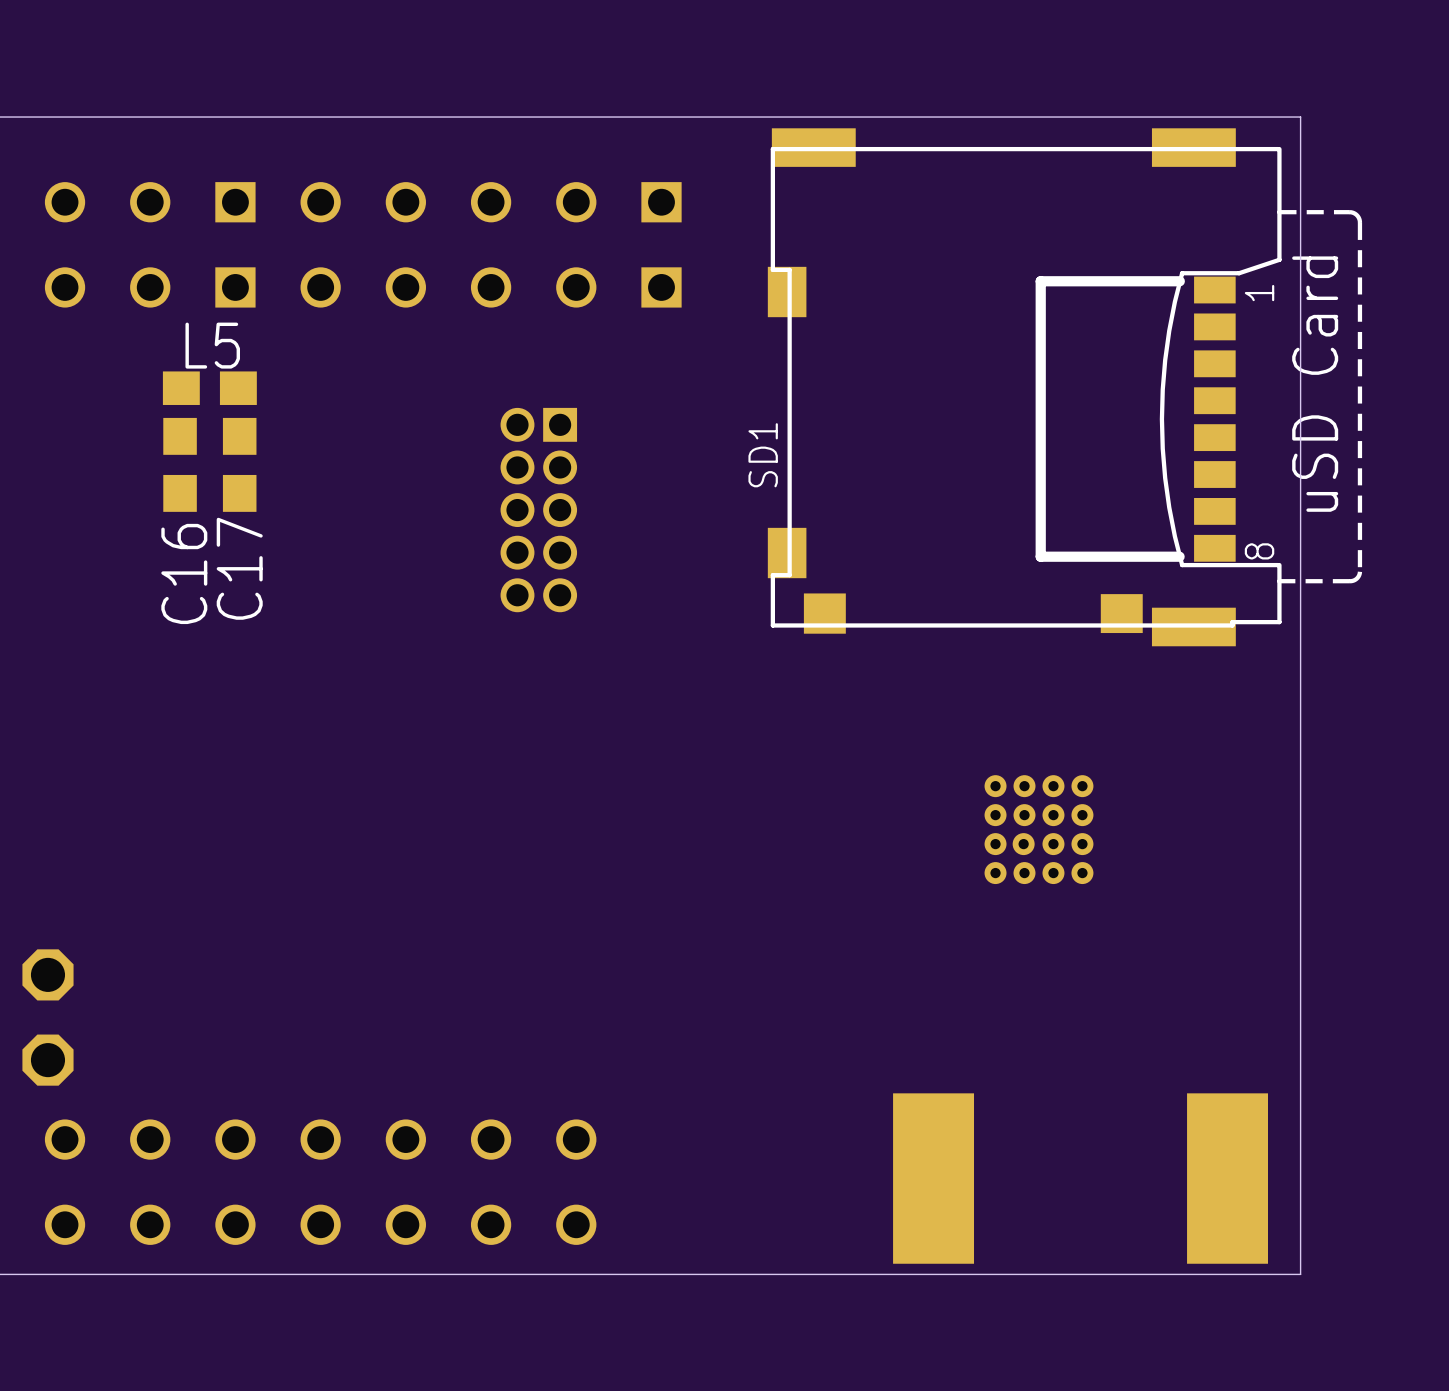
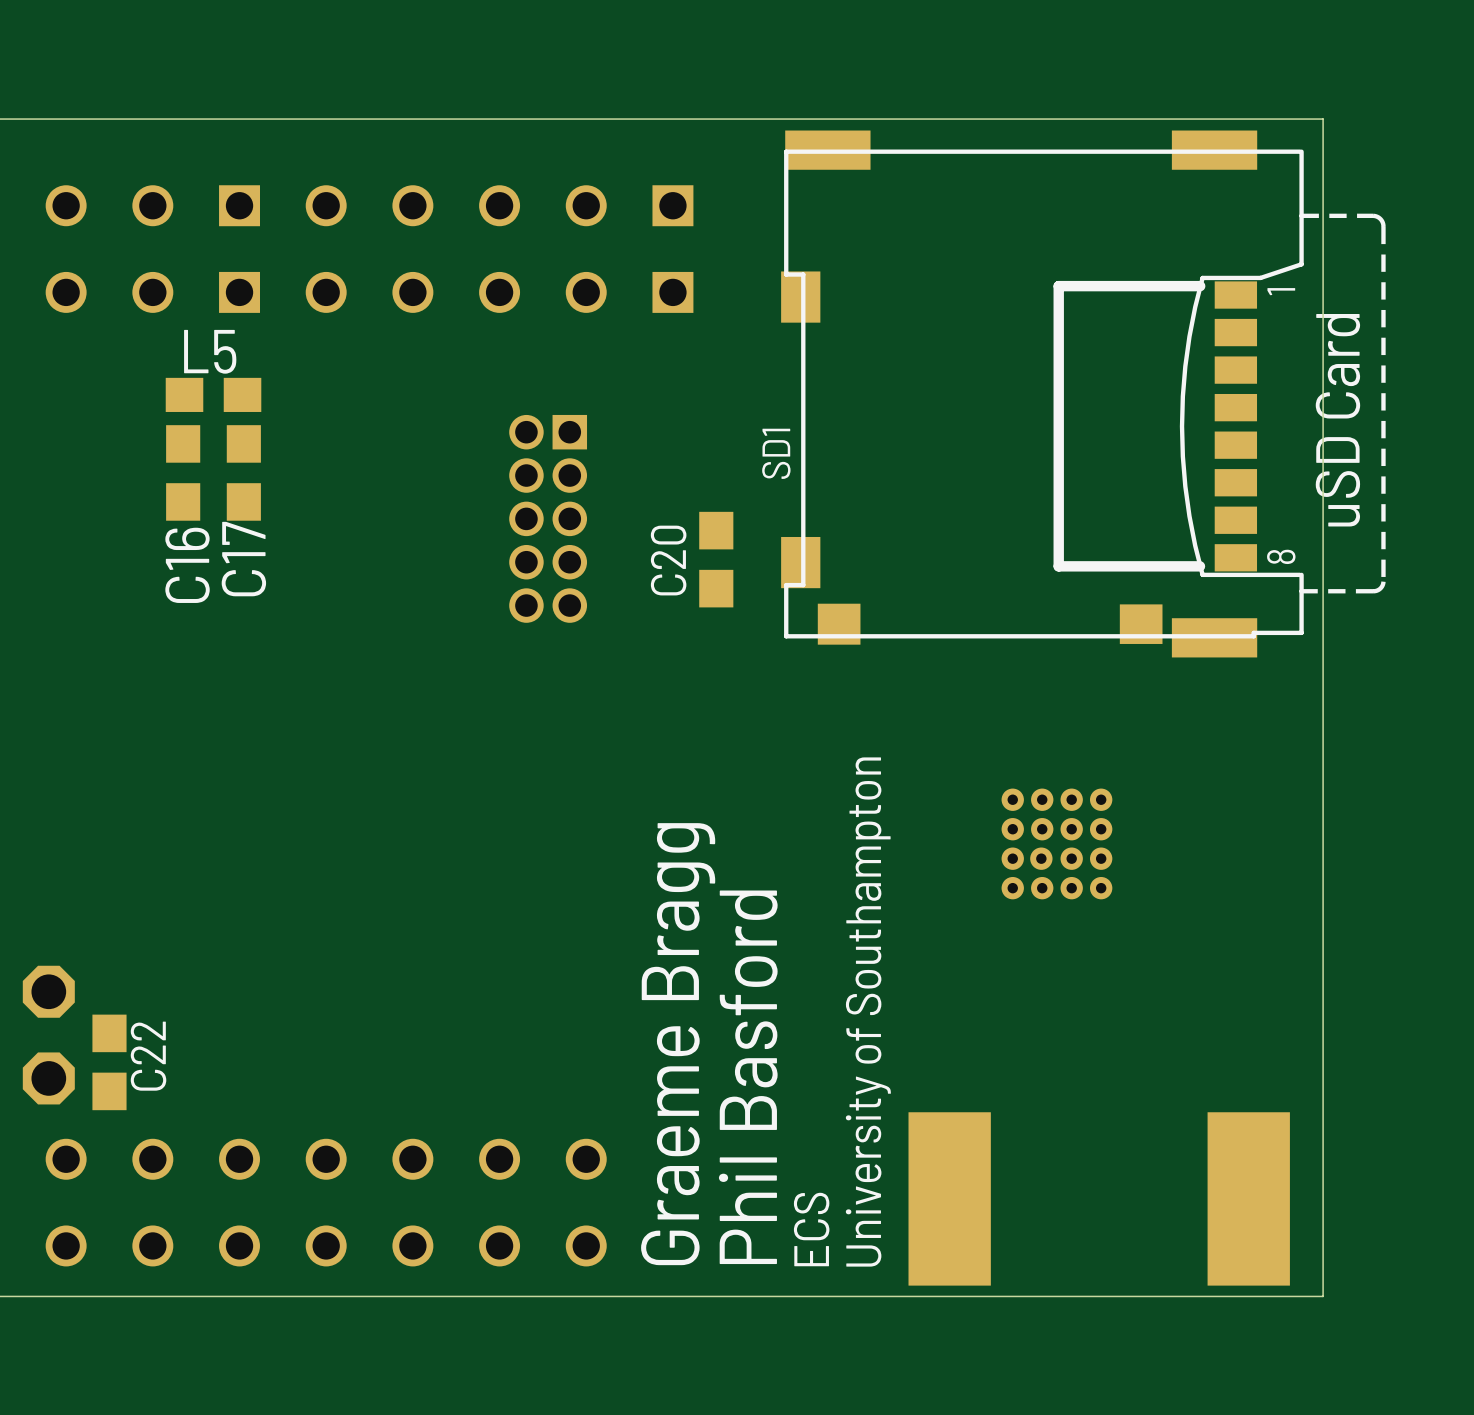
C20: none -> (716, 559)
text: none -> University of Southampton (868, 1012)
text: none -> Graeme Bragg (678, 1044)
text: none -> Phil Basford (748, 1077)
C22: none -> (109, 1062)
text: none -> ECS (811, 1229)

